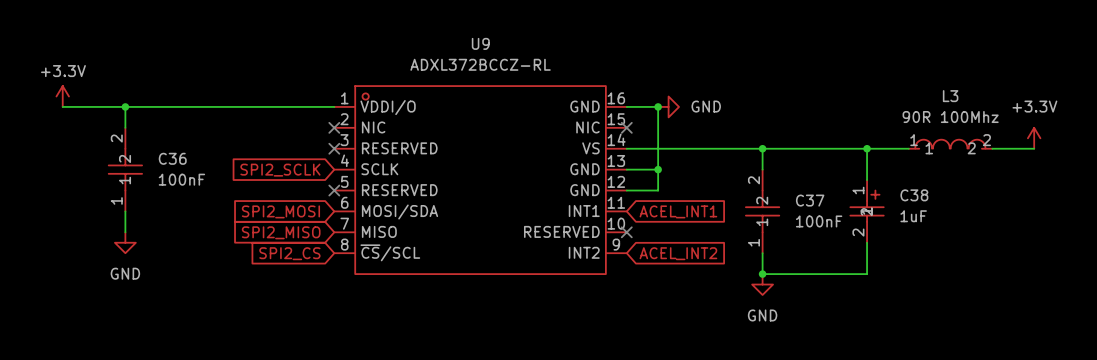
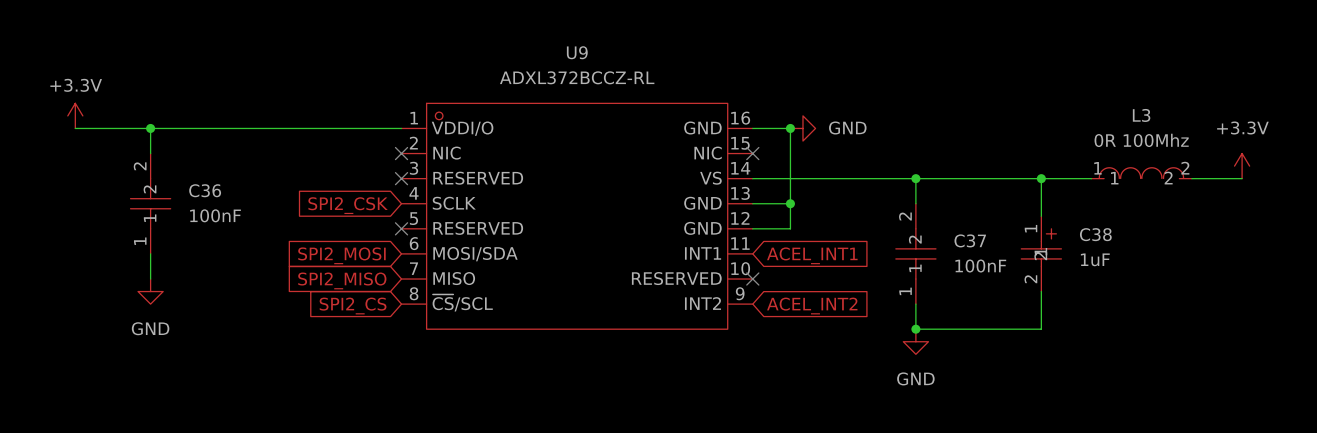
L3 value: 90R 100Mhz (950, 117) -> 0R 100Mhz (1141, 140)
global label: SPI2_SCLK (280, 170) -> SPI2_CSK (348, 205)

